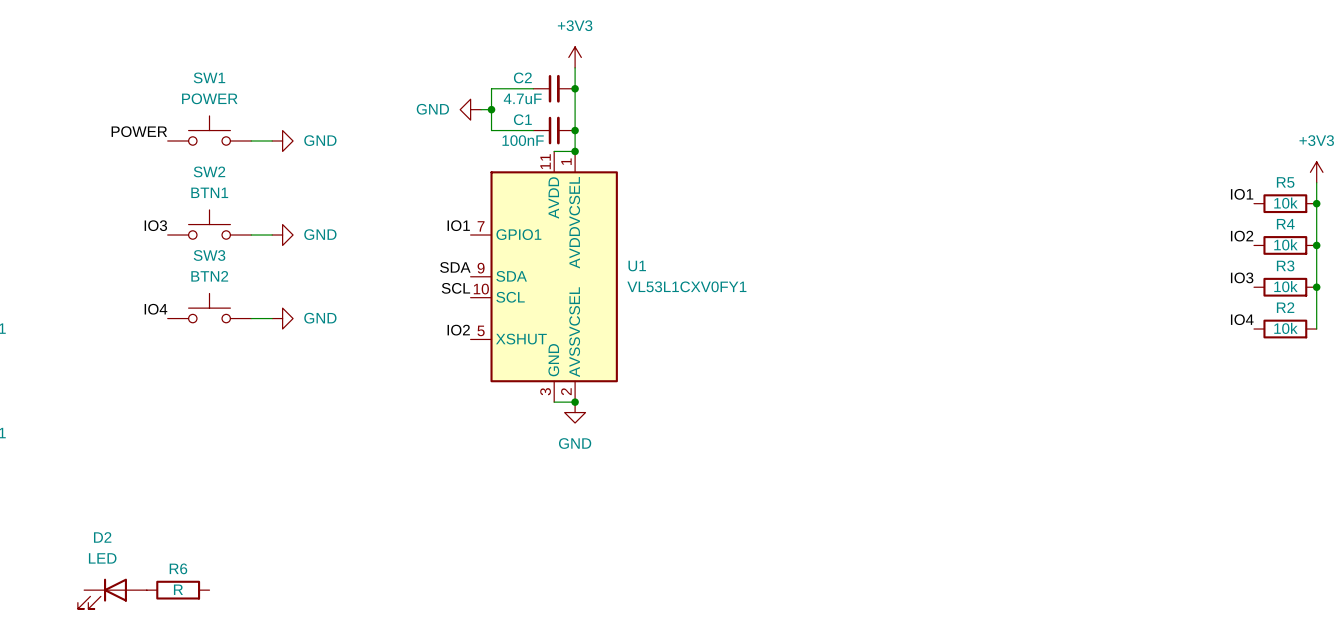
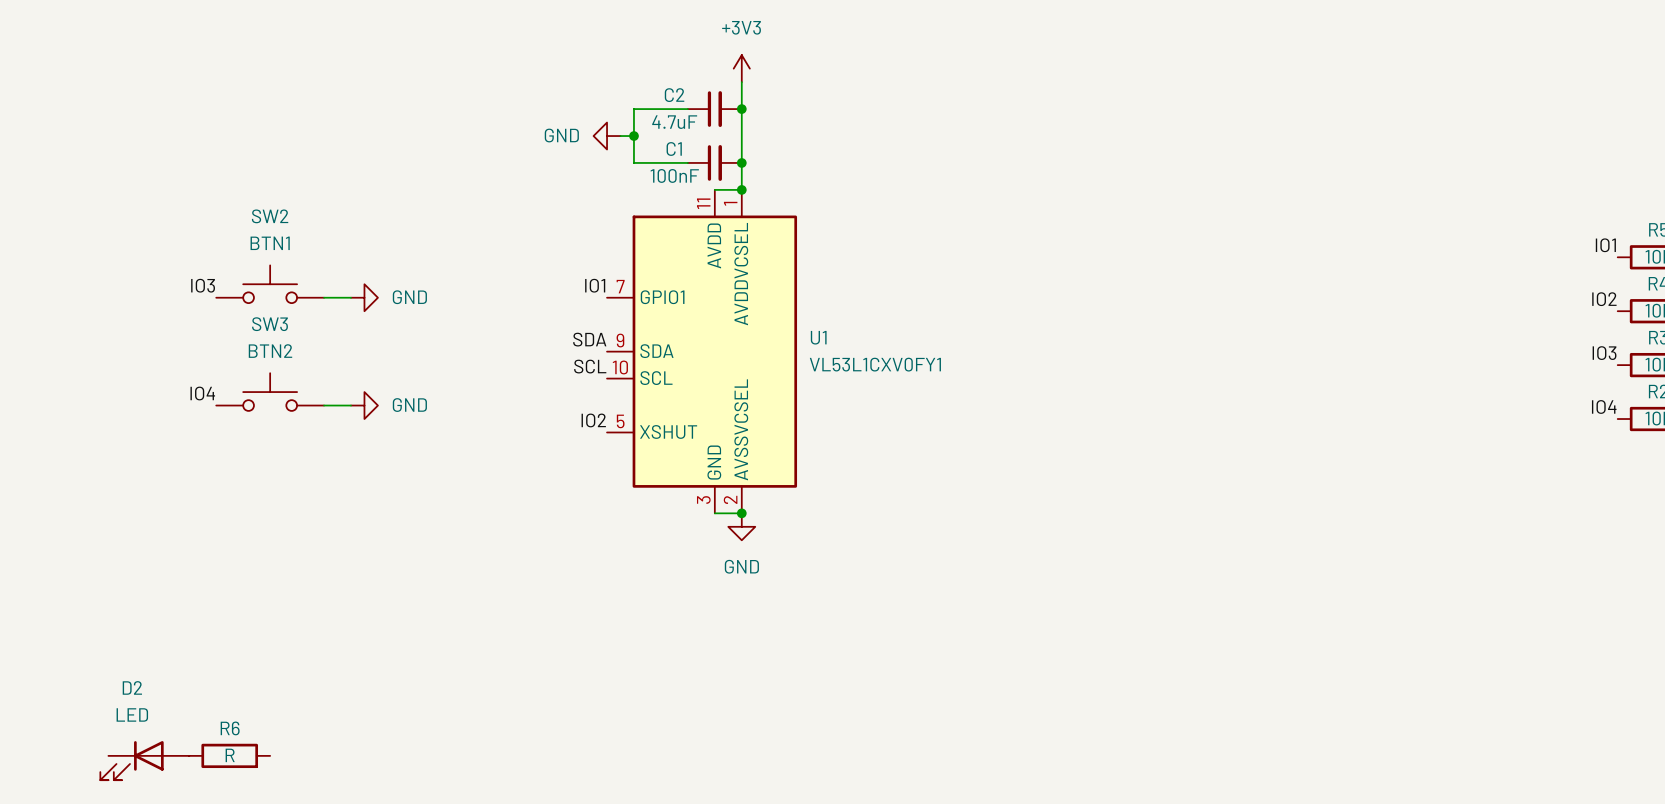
SW1: POWER (209, 130) -> none
label: POWER (139, 131) -> none
wire: (251, 140) (272, 140) -> none
power symbol: GND (282, 140) -> none

